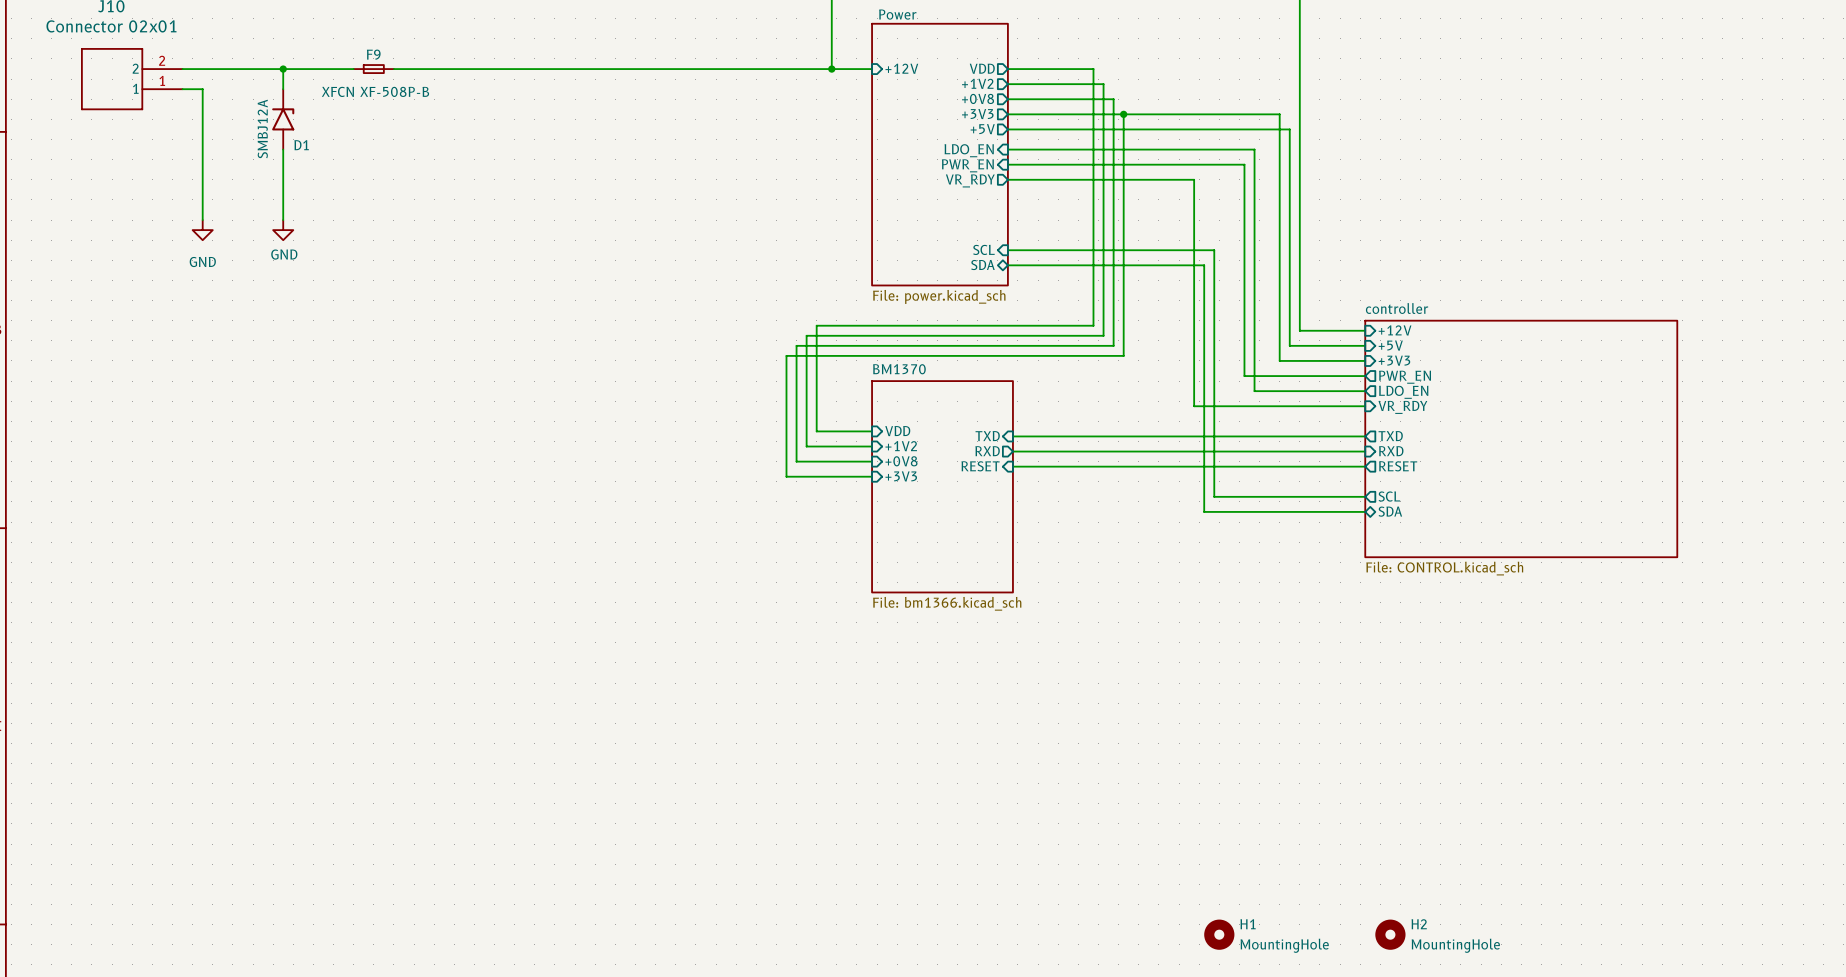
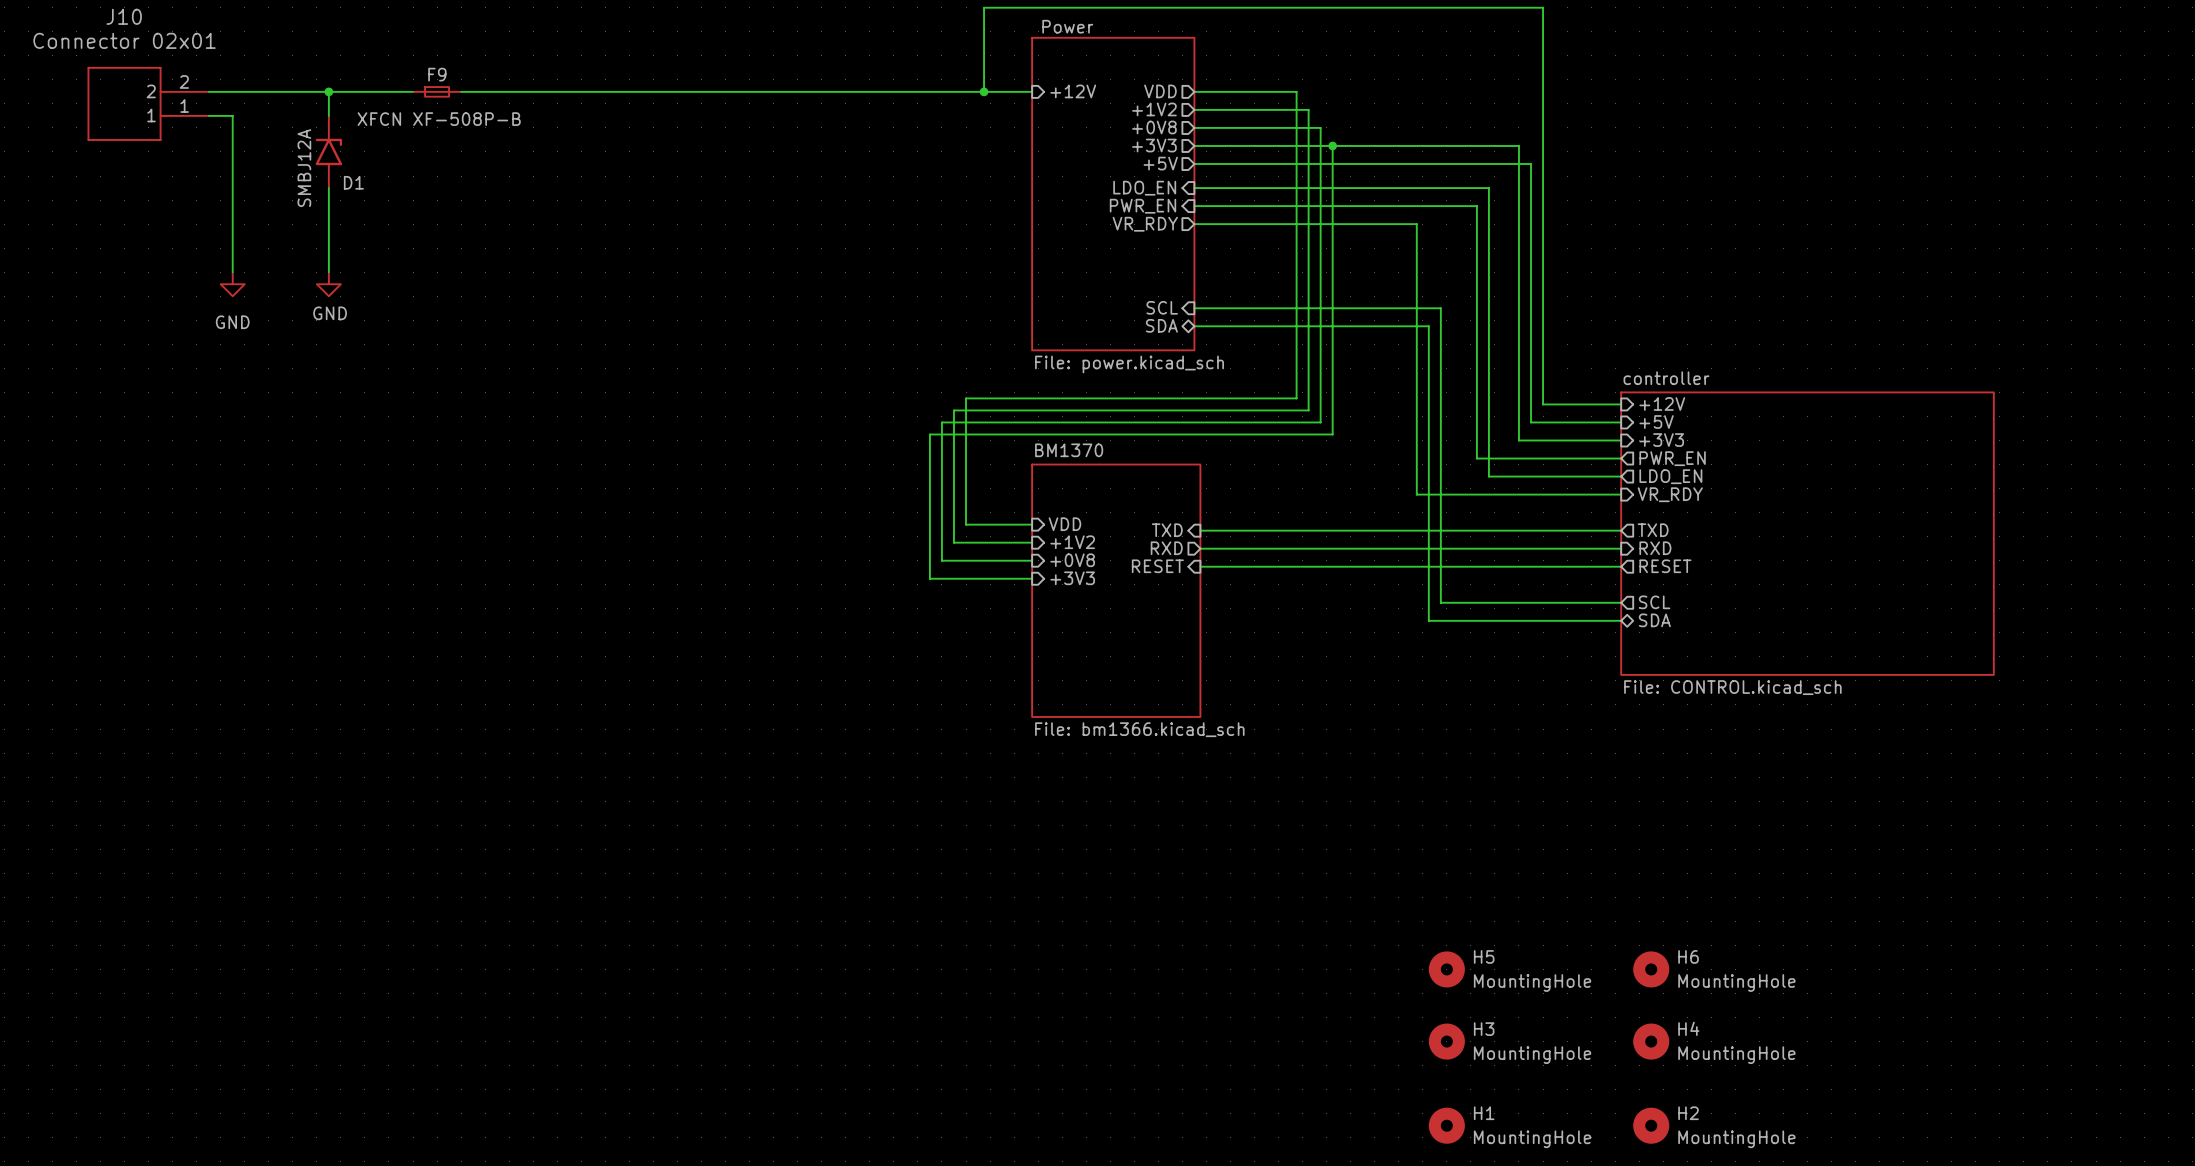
H5: none -> MountingHole (1446, 969)
H6: none -> MountingHole (1651, 969)
H3: none -> MountingHole (1446, 1041)
H4: none -> MountingHole (1651, 1041)

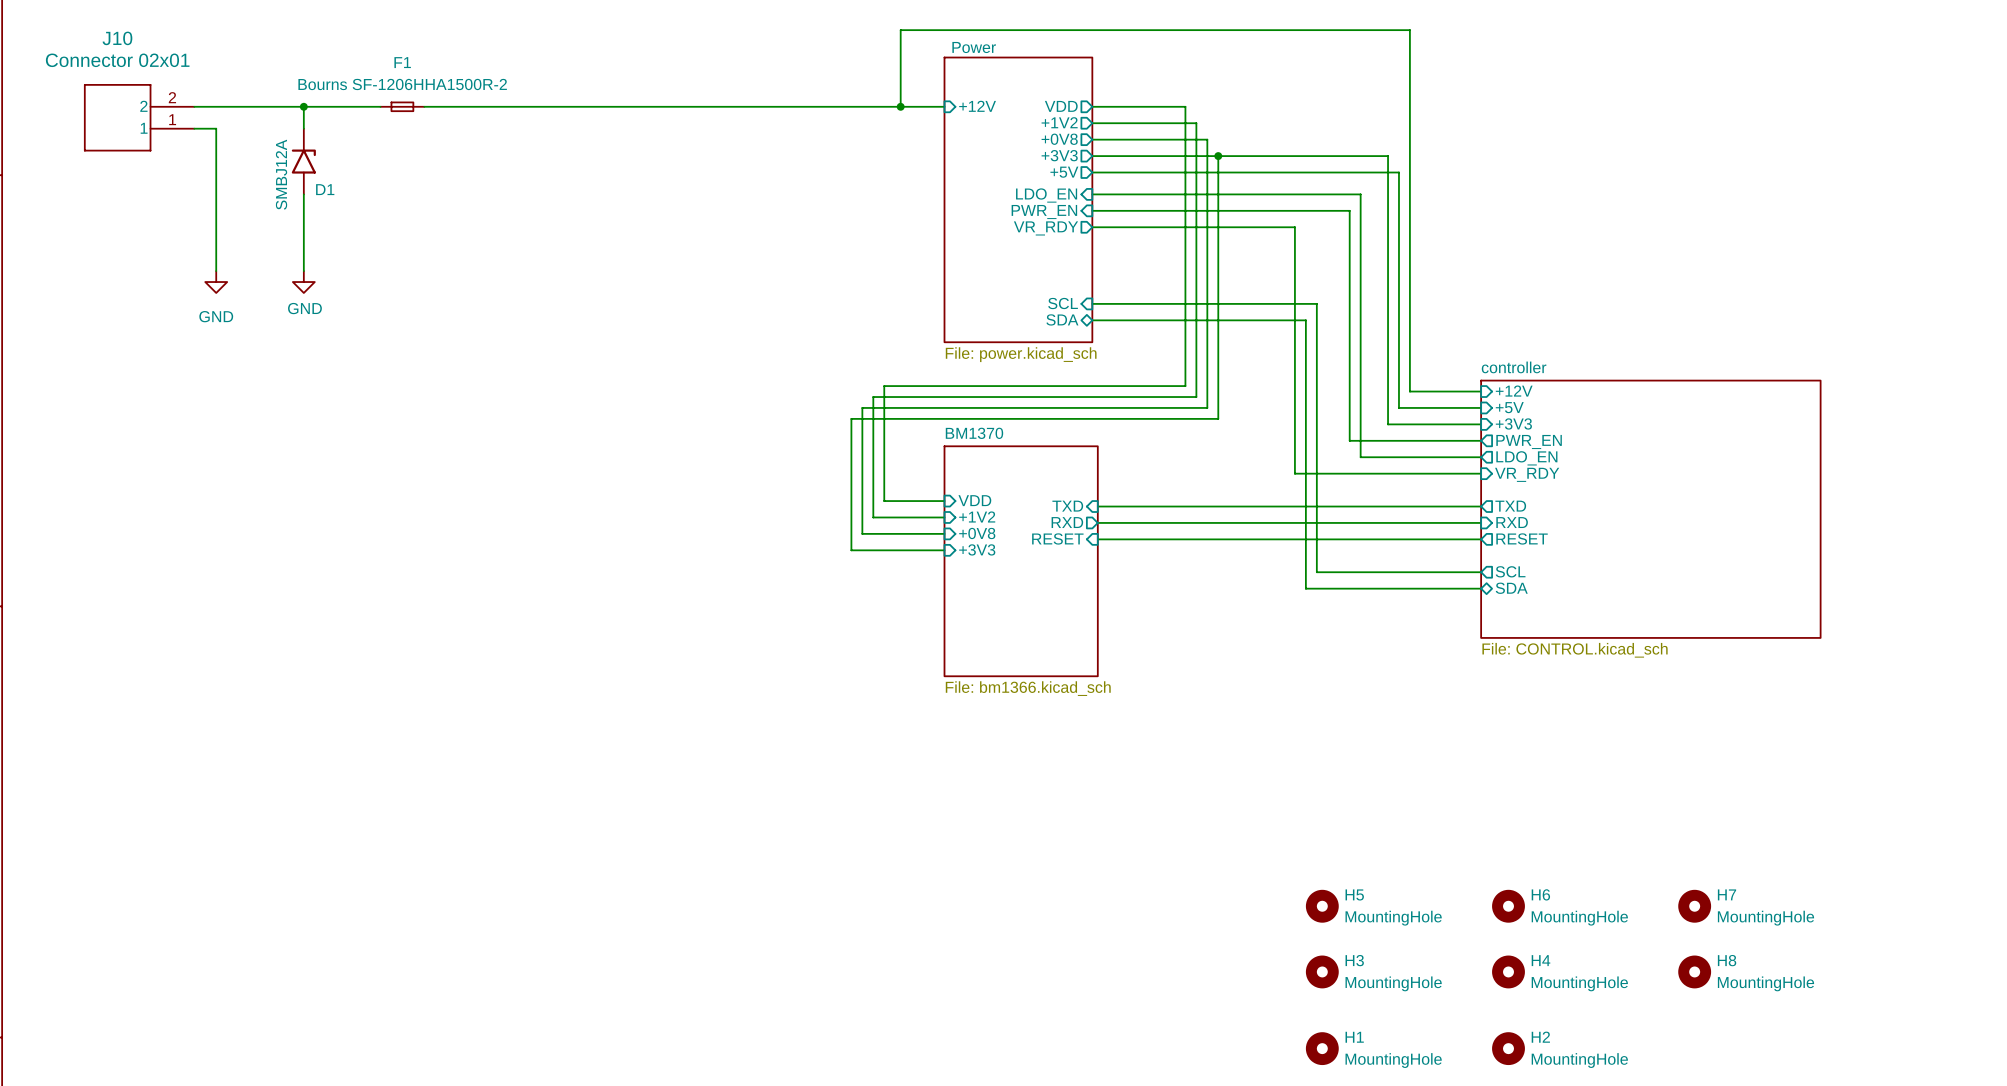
F9 name: F9 (437, 74) -> F1 (402, 62)
F9 value: XFCN XF-508P-B (439, 119) -> Bourns SF-1206HHA1500R-2 (402, 84)
H7: none -> MountingHole (1694, 906)
H8: none -> MountingHole (1694, 971)

